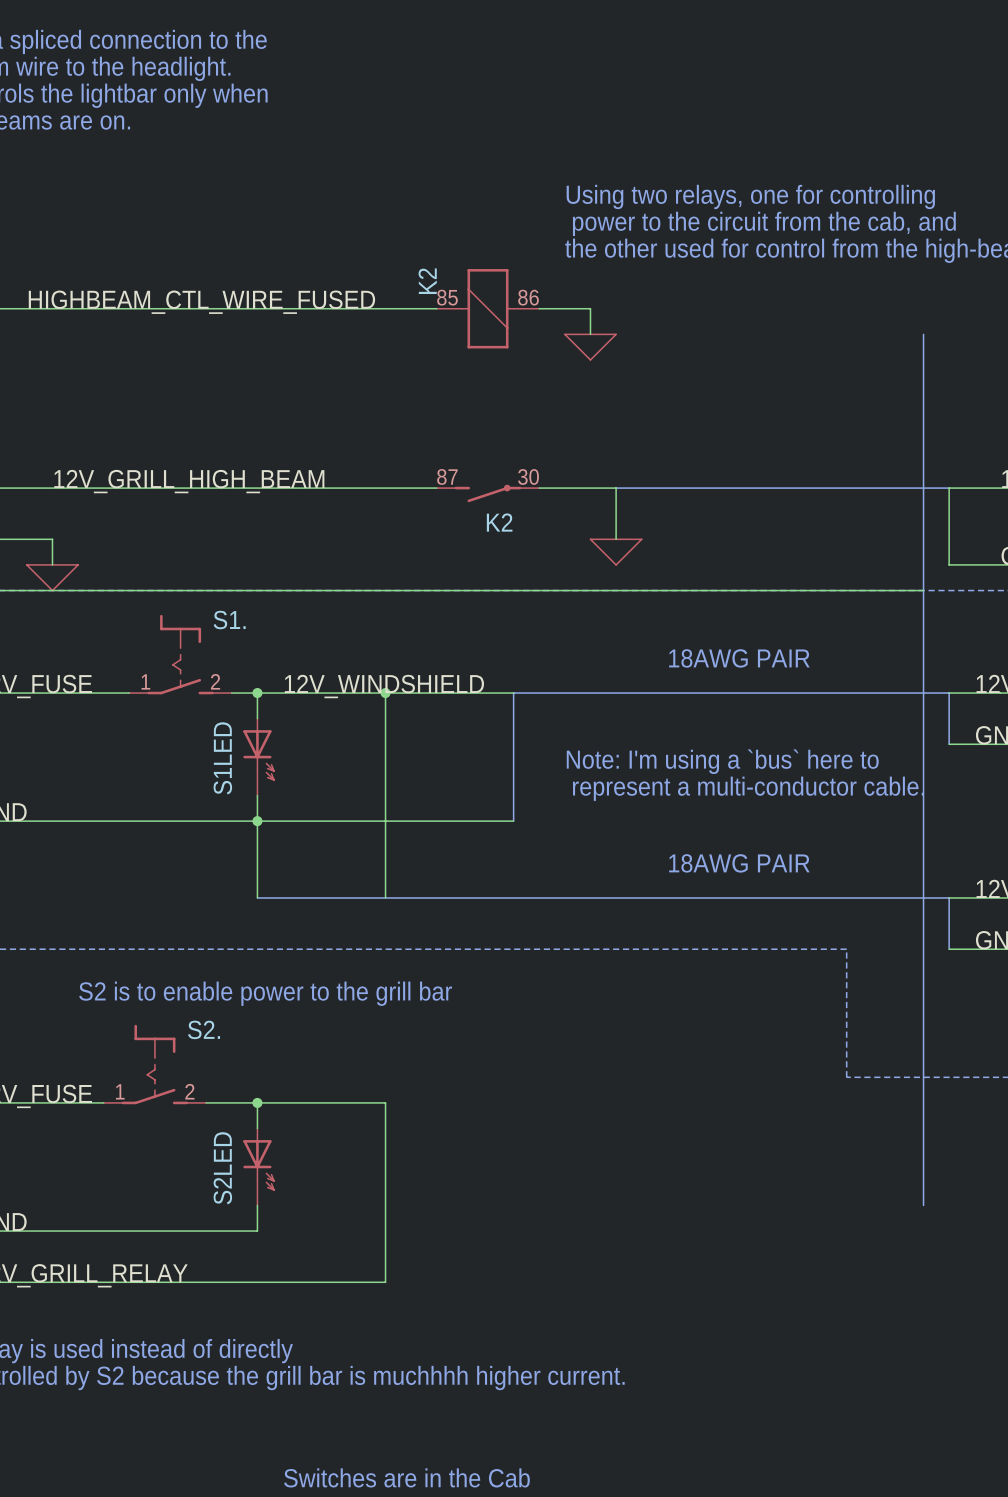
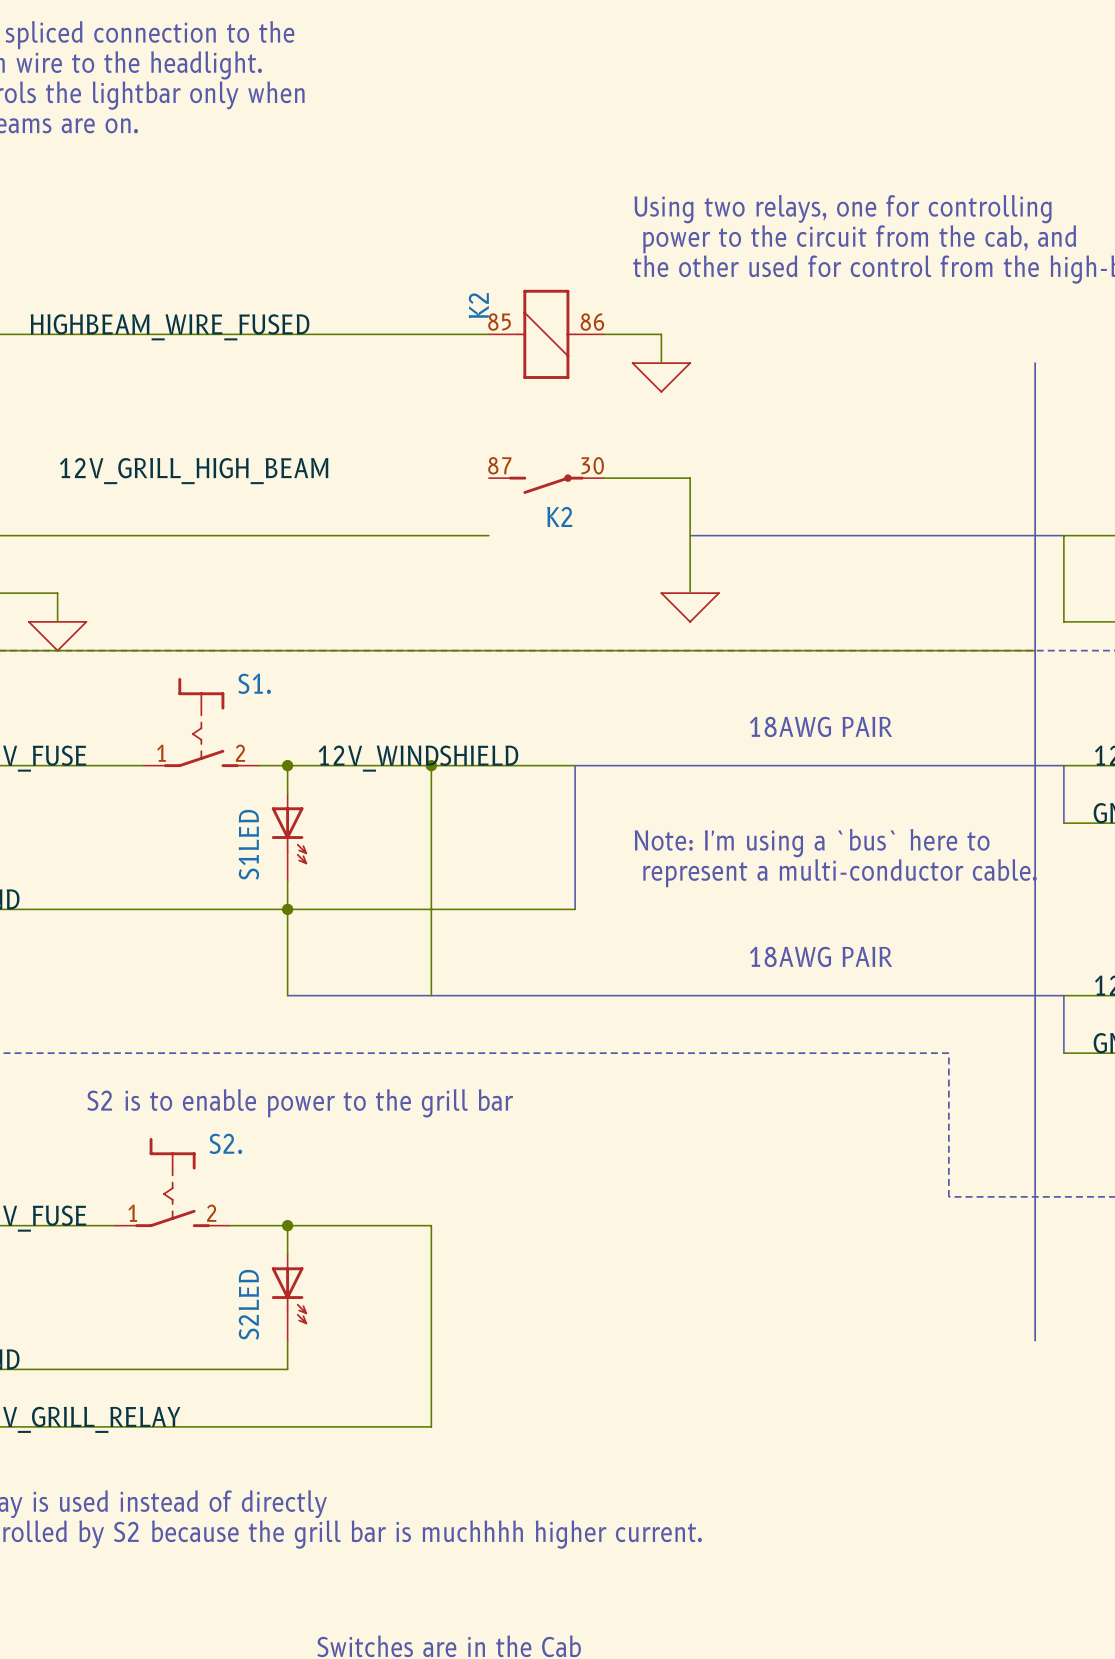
label: HIGHBEAM_CTL_WIRE_FUSED (201, 302) -> HIGHBEAM_WIRE_FUSED (170, 327)
label position: 12V_GRILL_HIGH_BEAM (189, 481) -> 12V_GRILL_HIGH_BEAM (194, 471)
wire: (539, 488) (616, 488) -> (603, 478) (690, 478) (690, 535)
K2 position: (488, 493) -> (546, 484)

